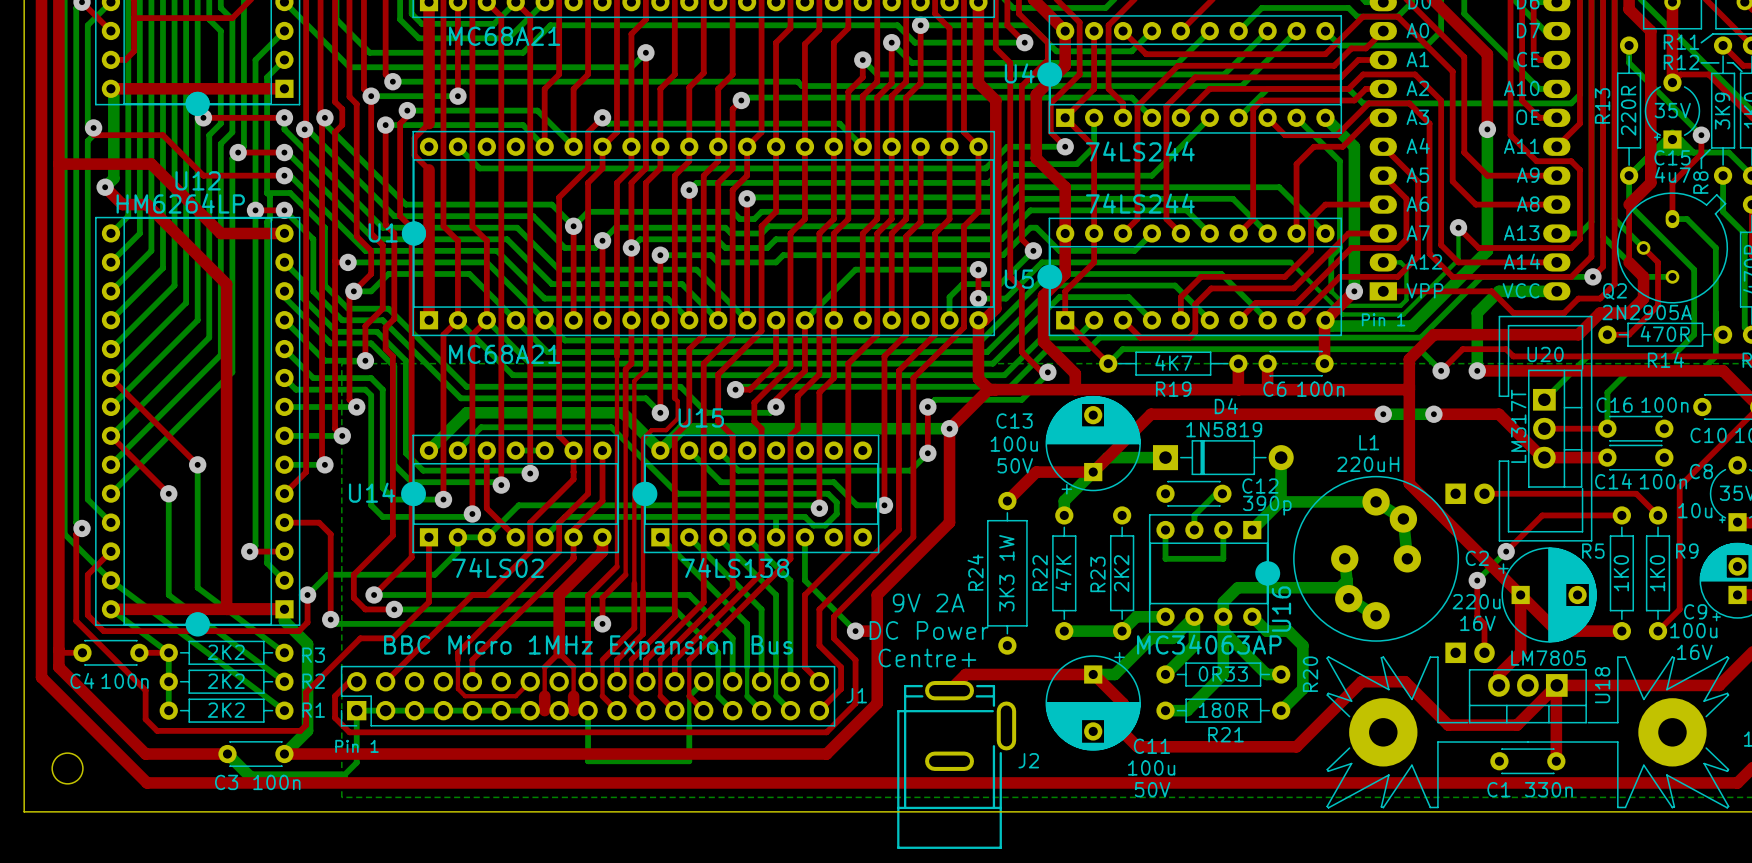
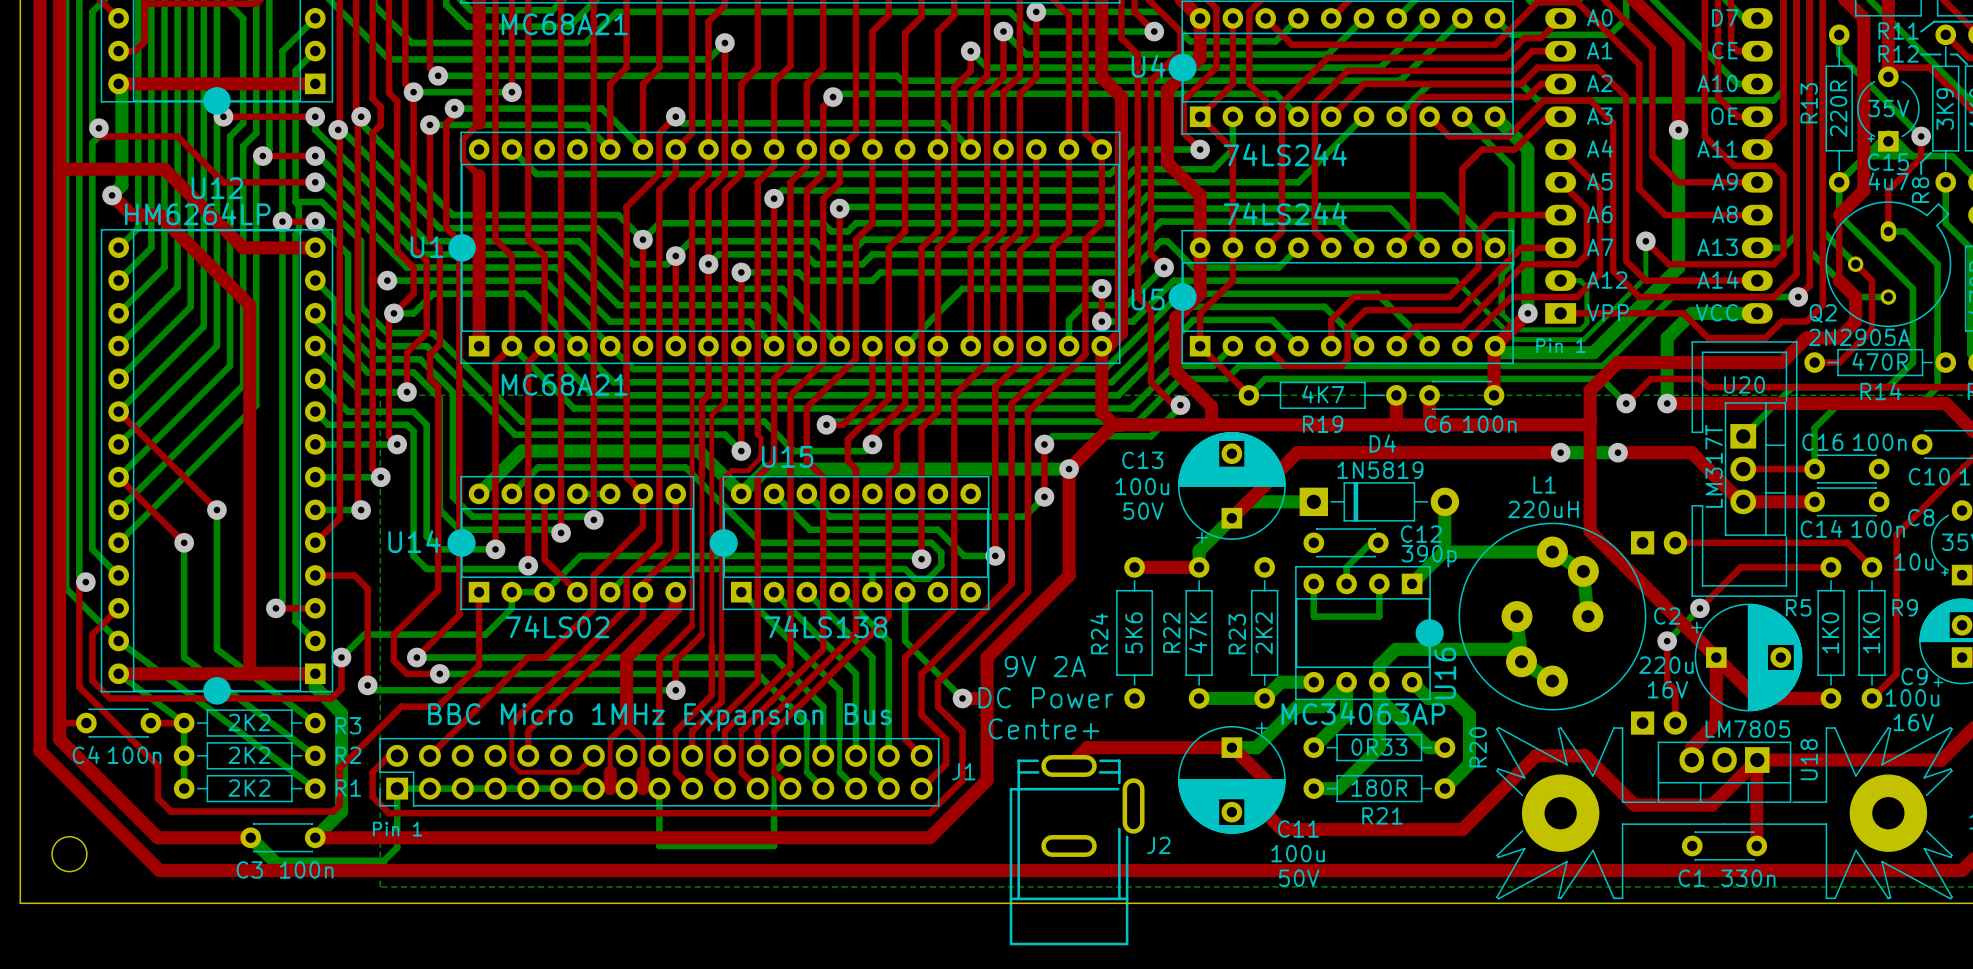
top track: (1093, 472) (1036, 472) (1007, 500) -> none
R24 footprint: [987, 491, 1028, 655] -> [1116, 557, 1154, 709]
top track: none -> (1134, 567) (1199, 567)
R24 value: 3K3 1W (1006, 573) -> 5K6 (1134, 632)

